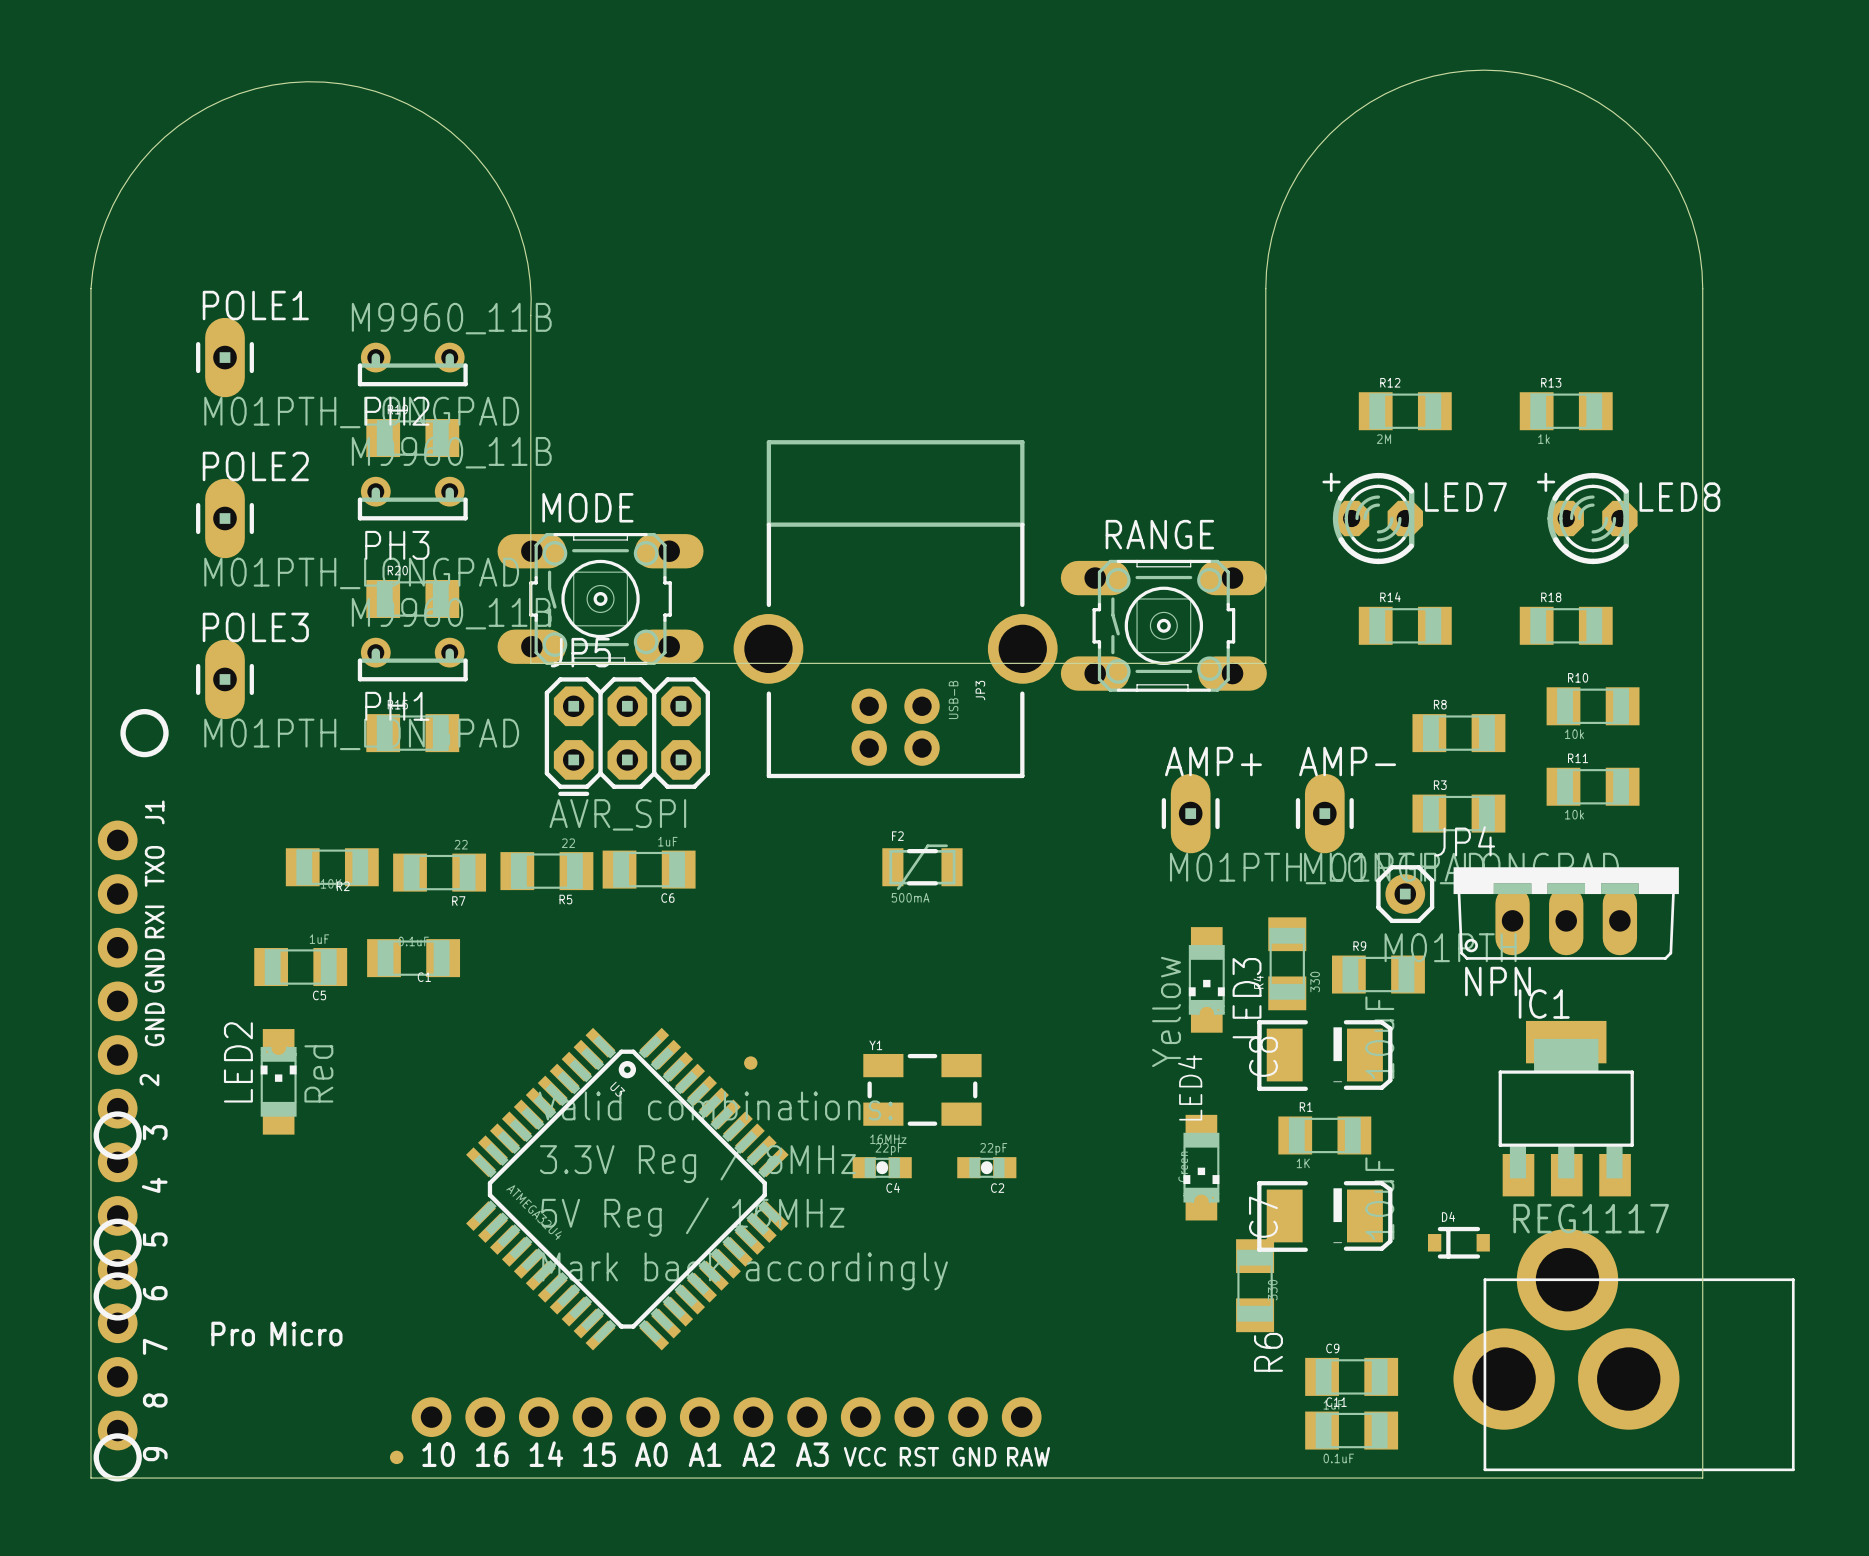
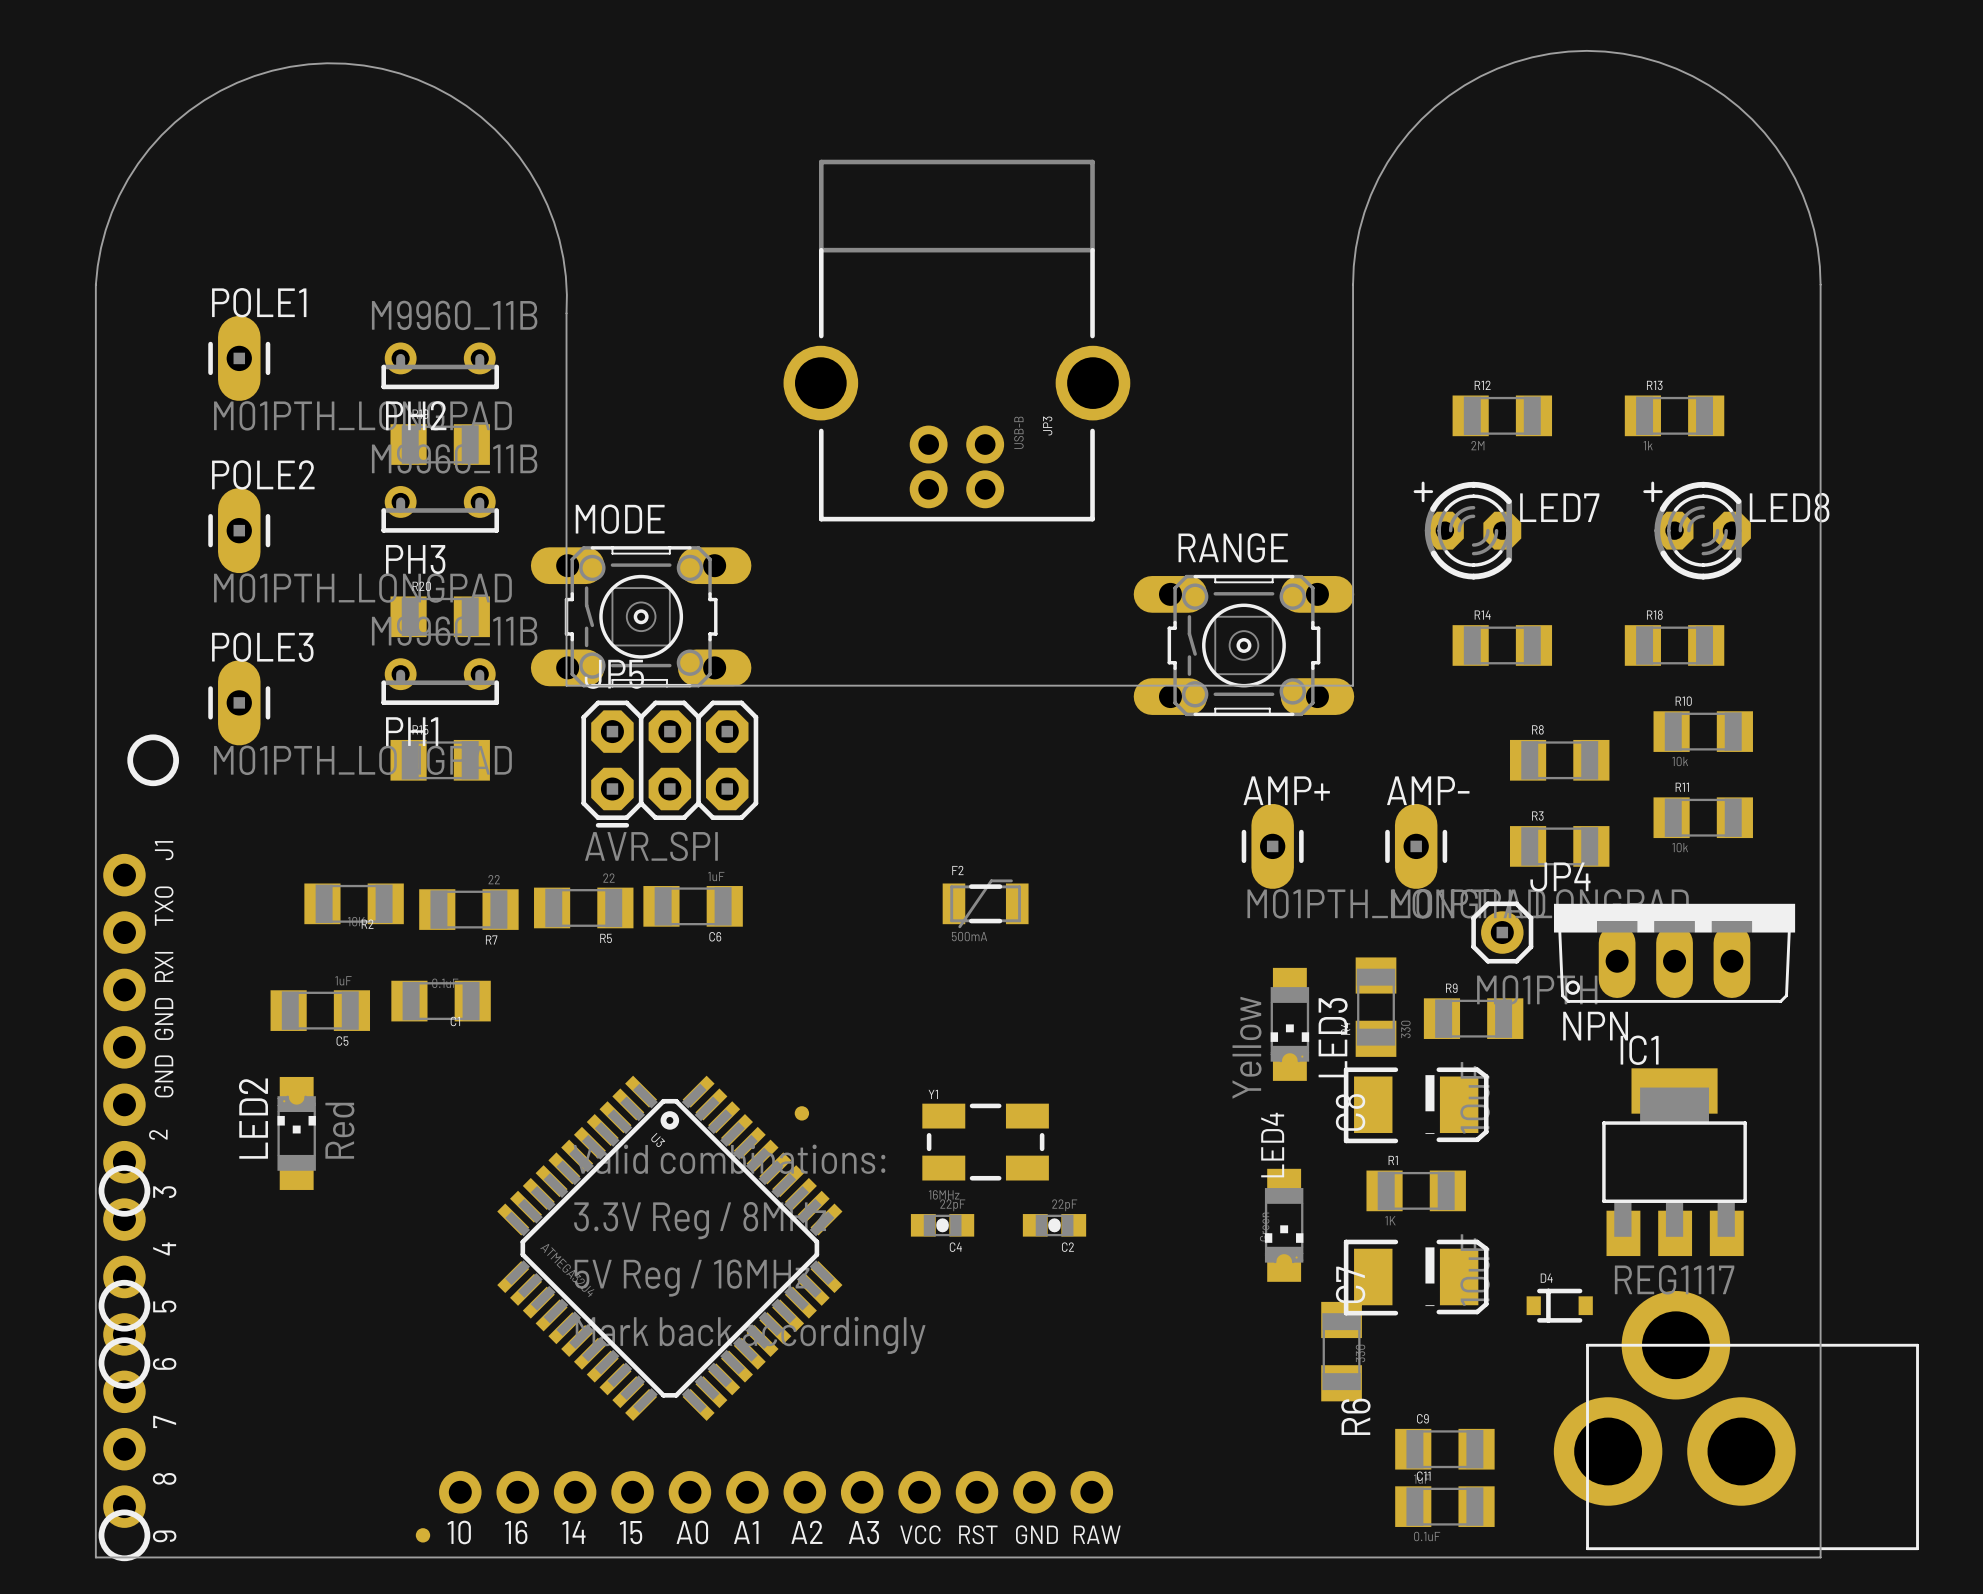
JP3 position: (895, 609) -> (956, 340)
text: Pro (233, 1333) -> none
text: Micro (306, 1333) -> none

